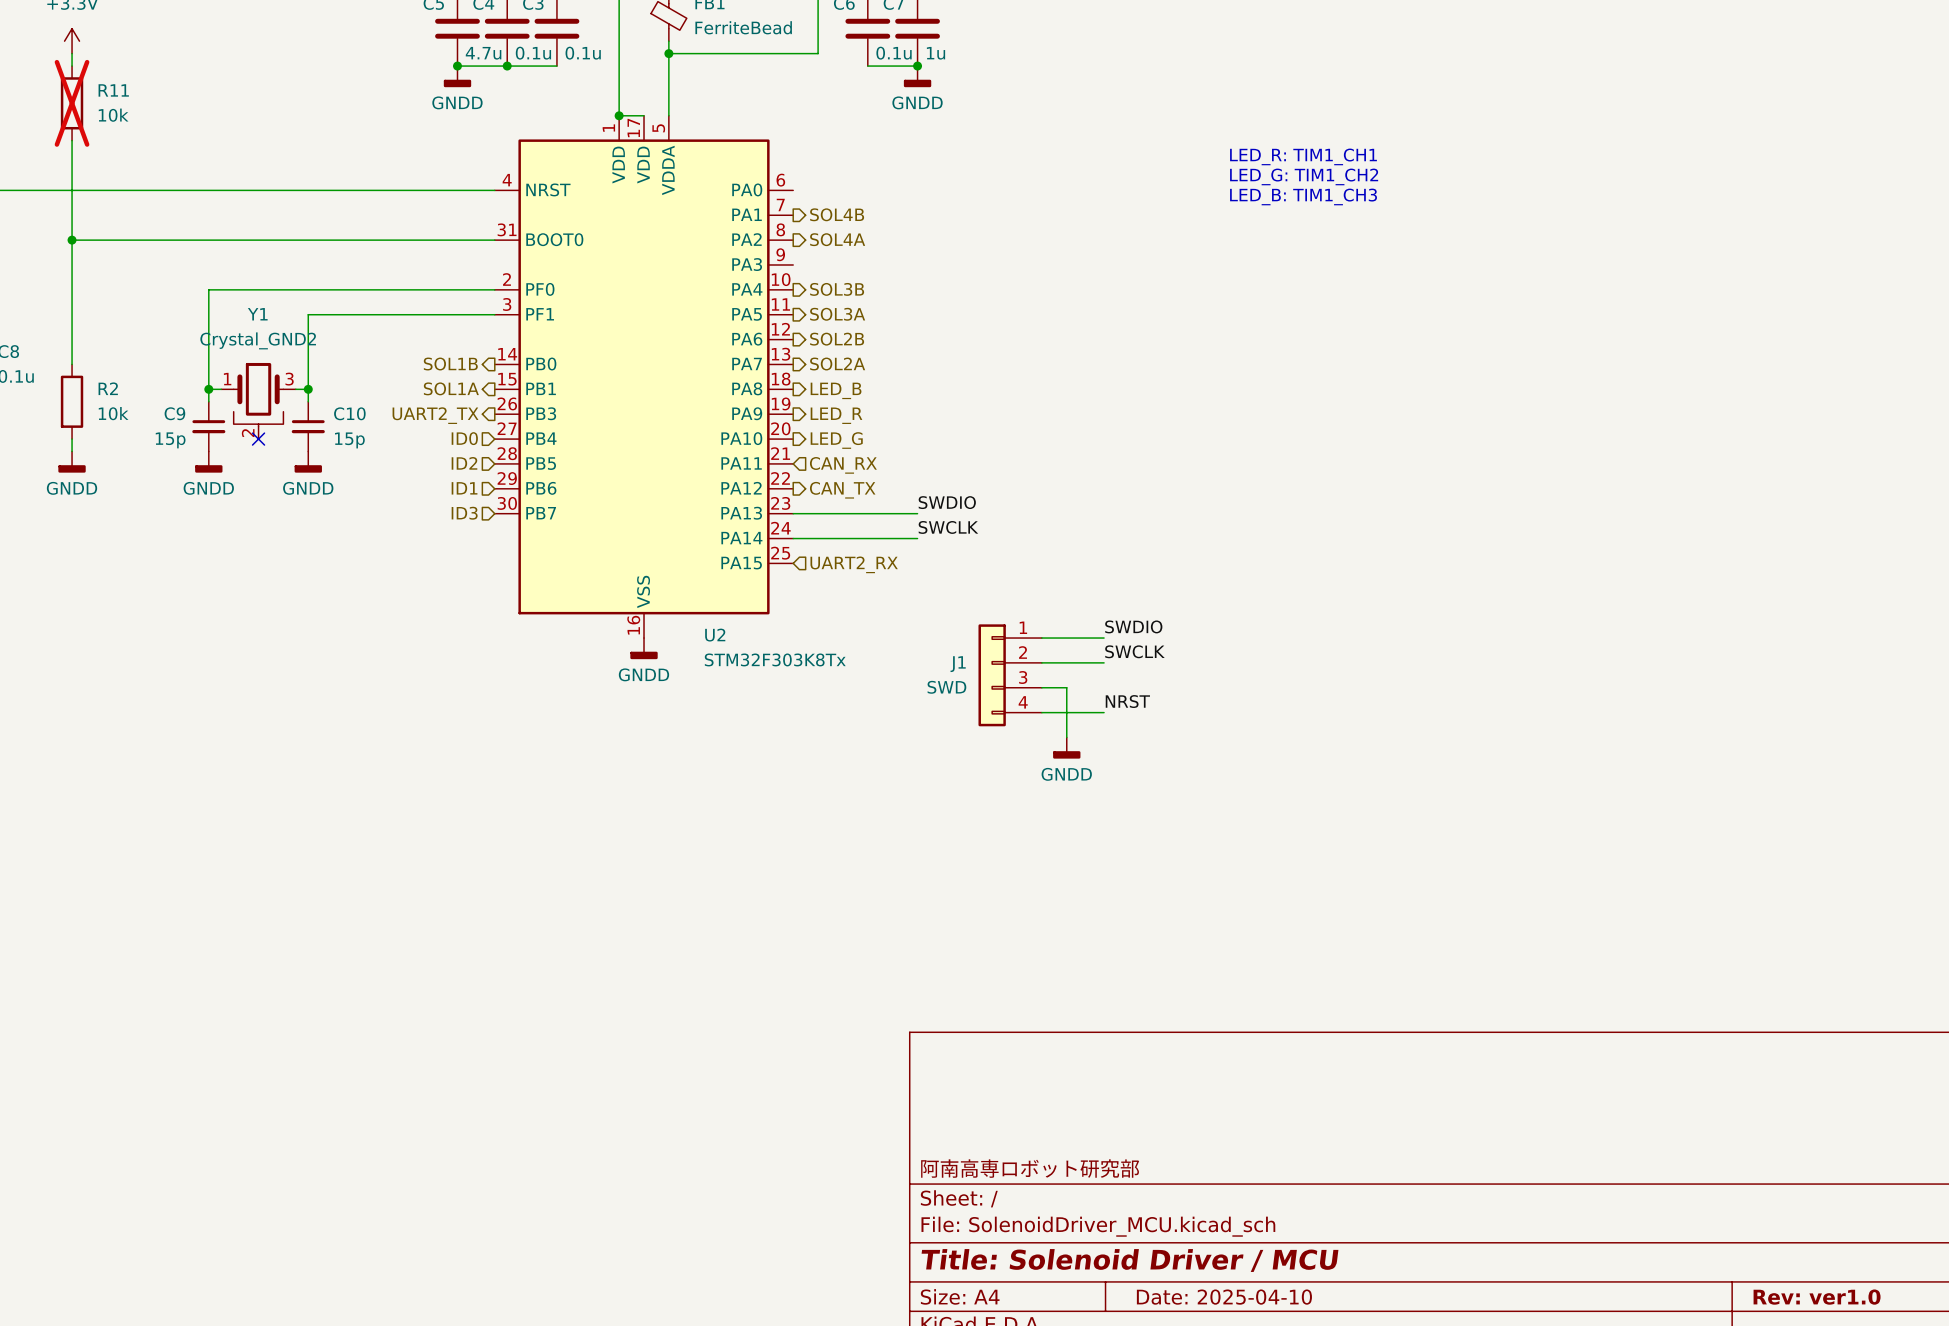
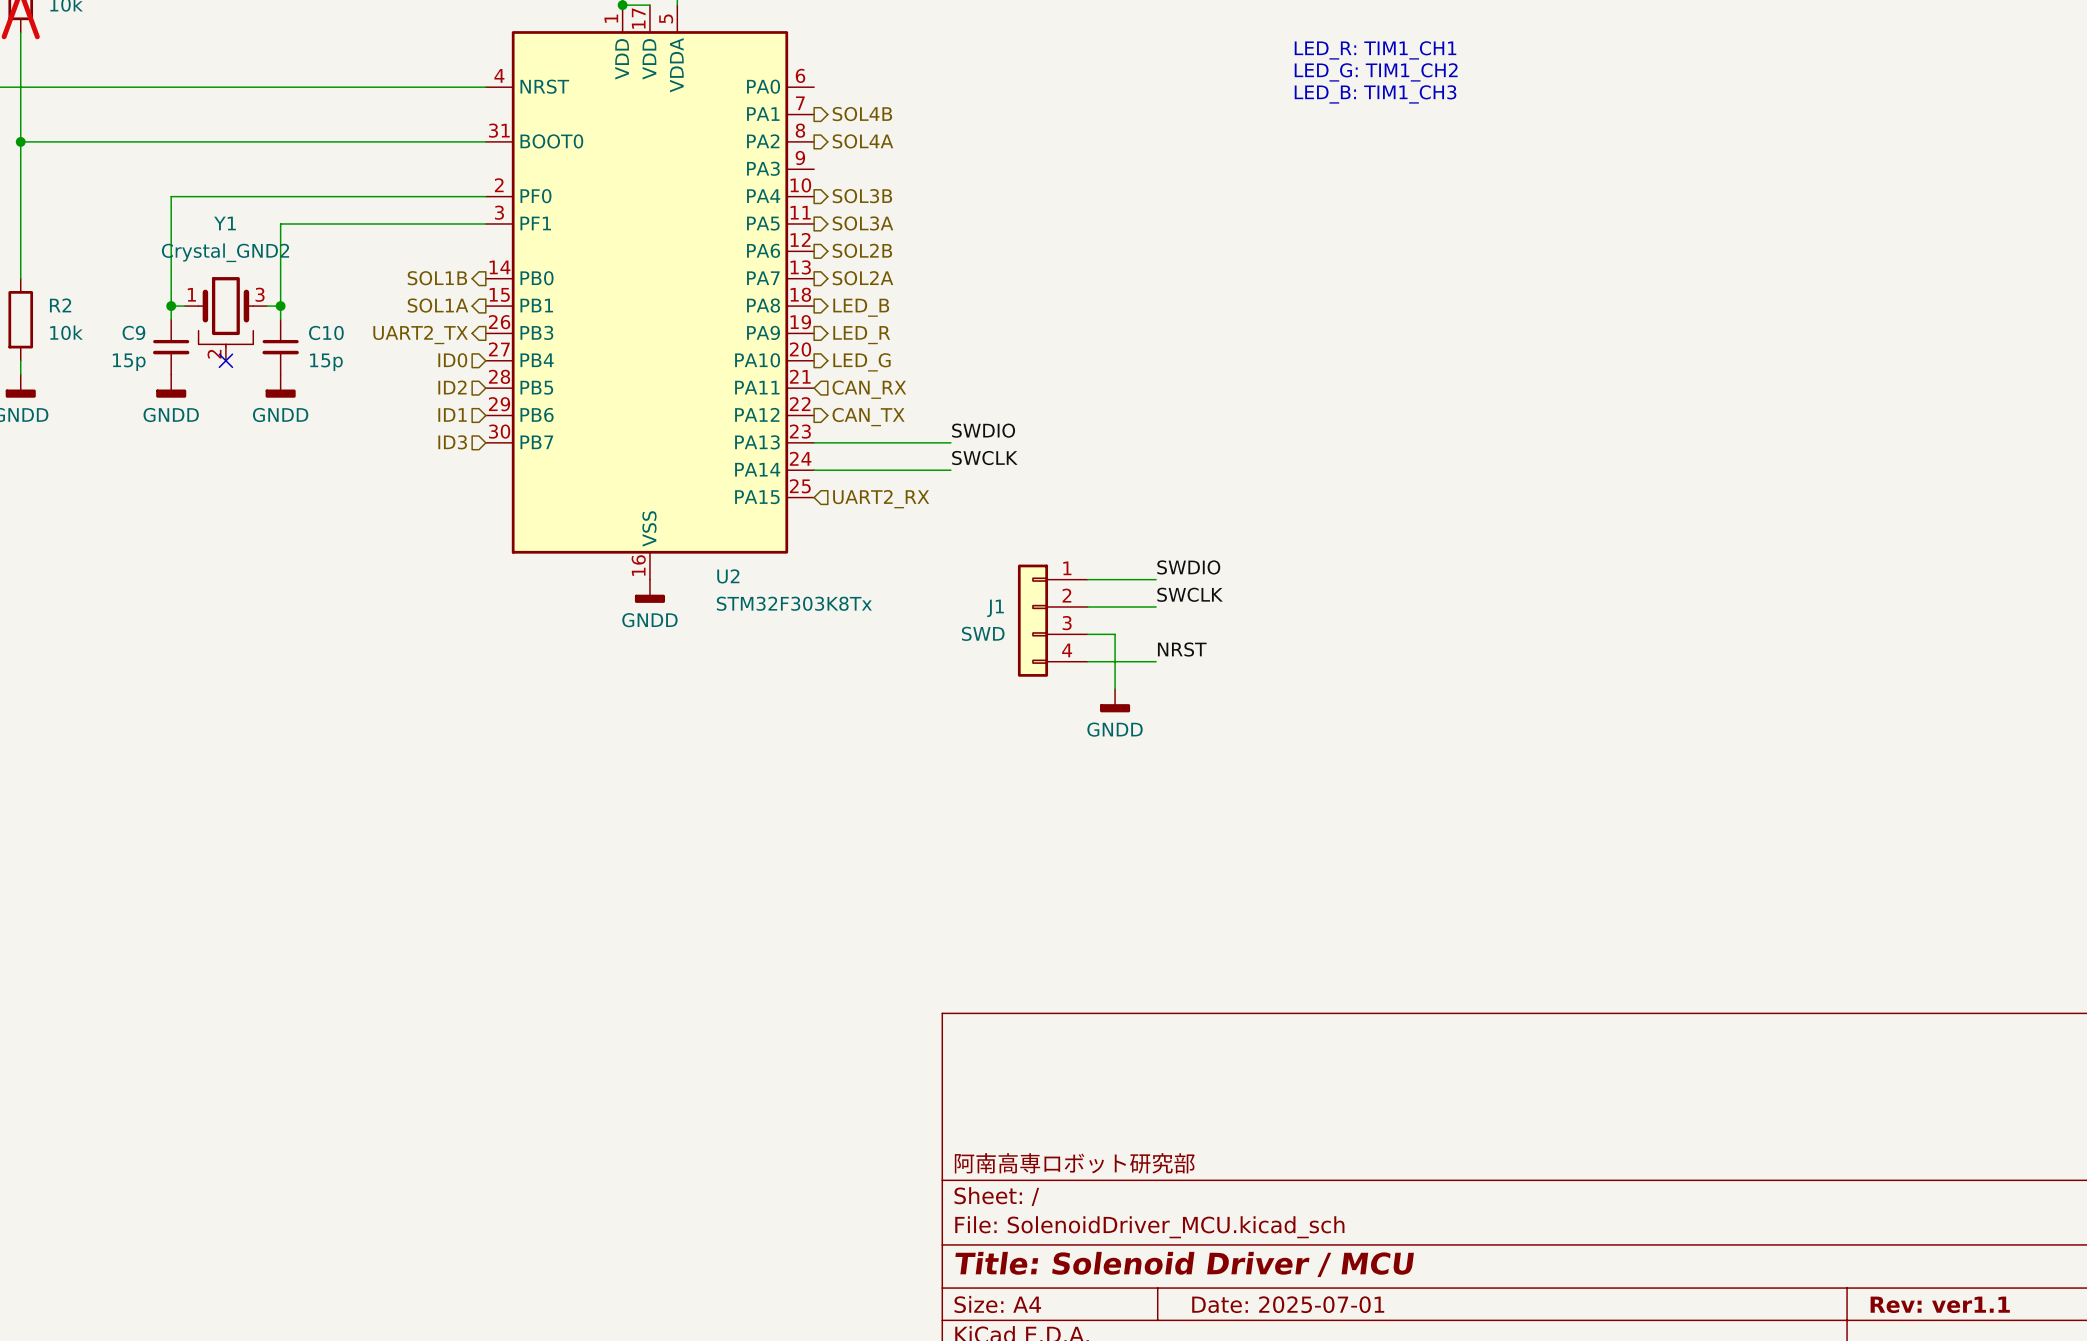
title block: Date: 2025-04-10 (1224, 1297) -> Date: 2025-07-01 (1288, 1304)
title block: Rev: ver1.0 (1817, 1297) -> Rev: ver1.1 (1940, 1304)

